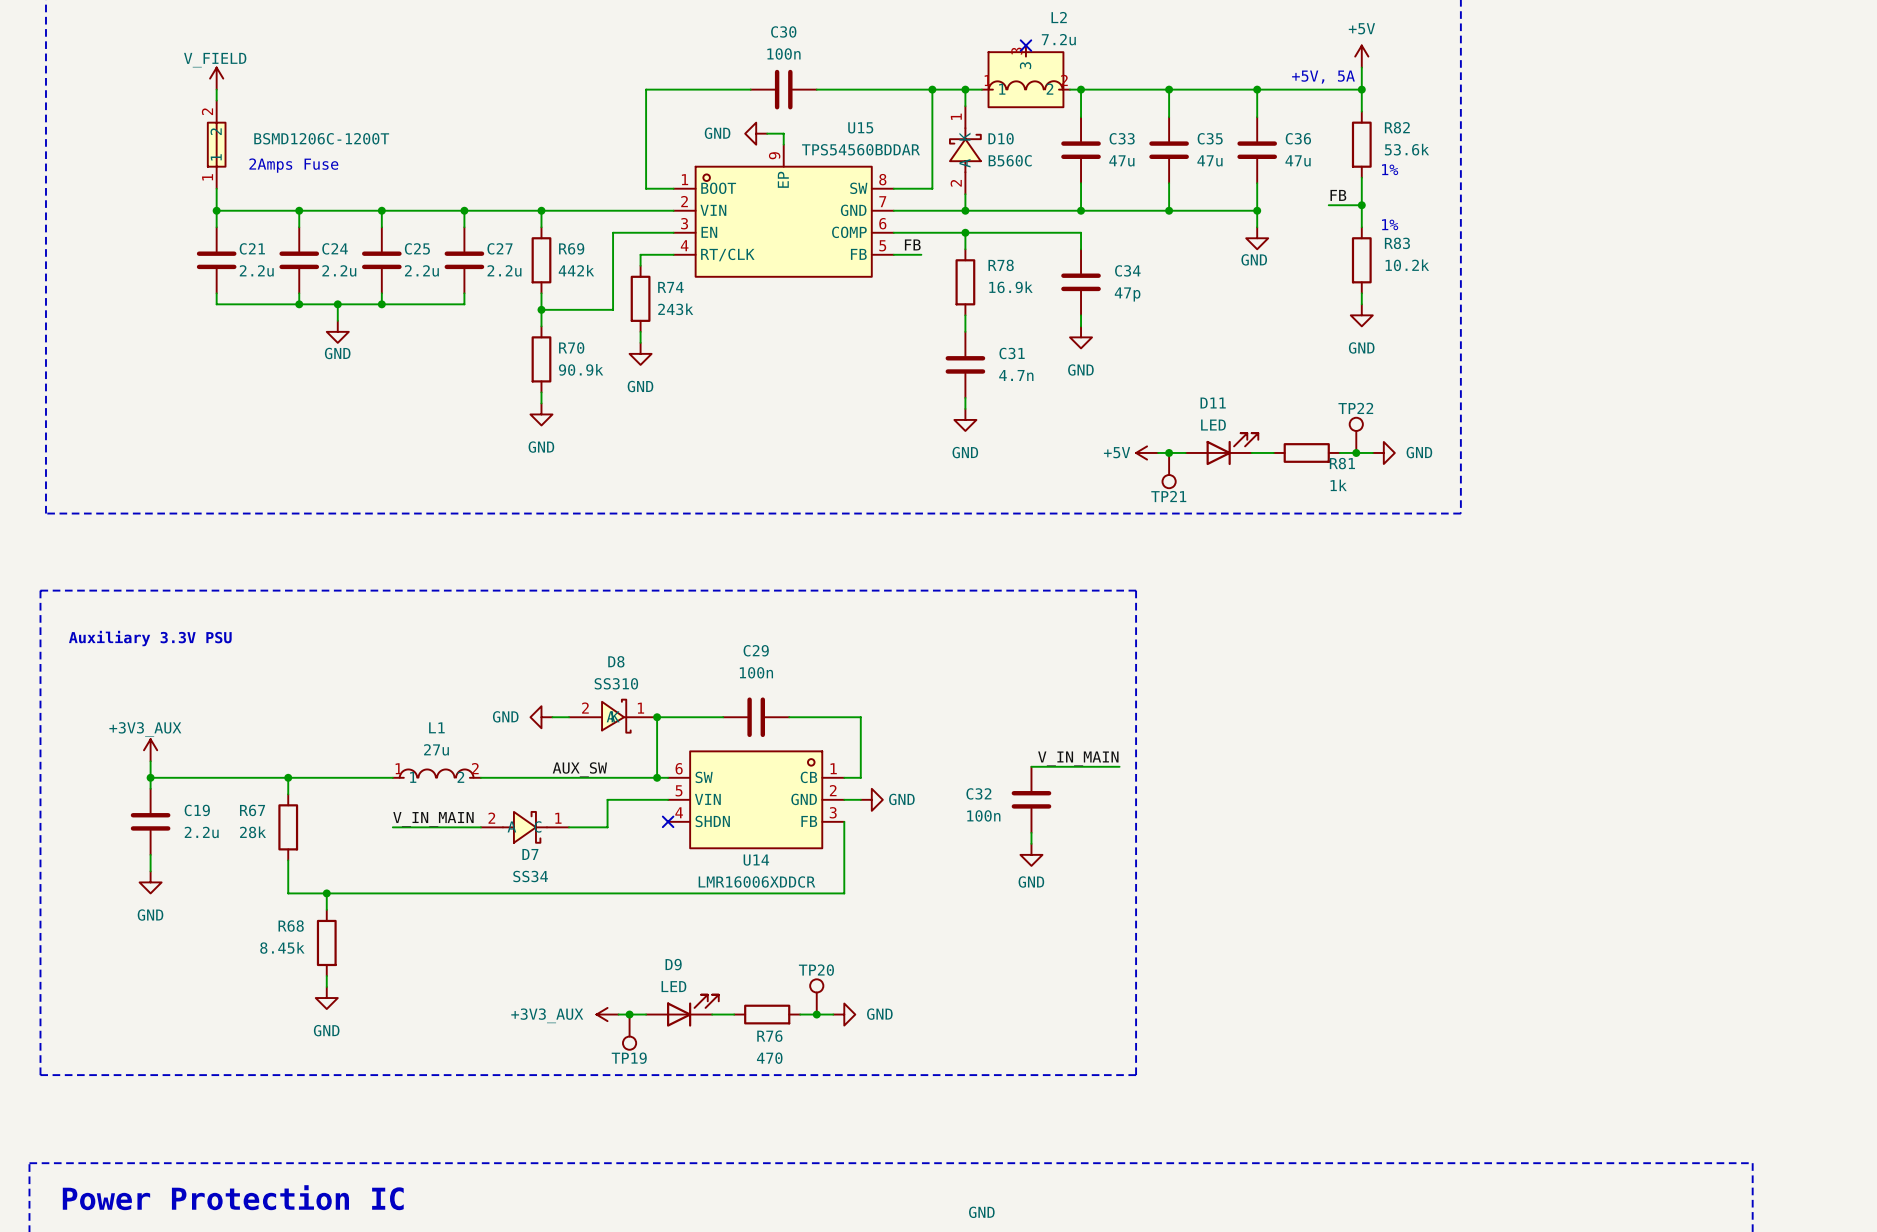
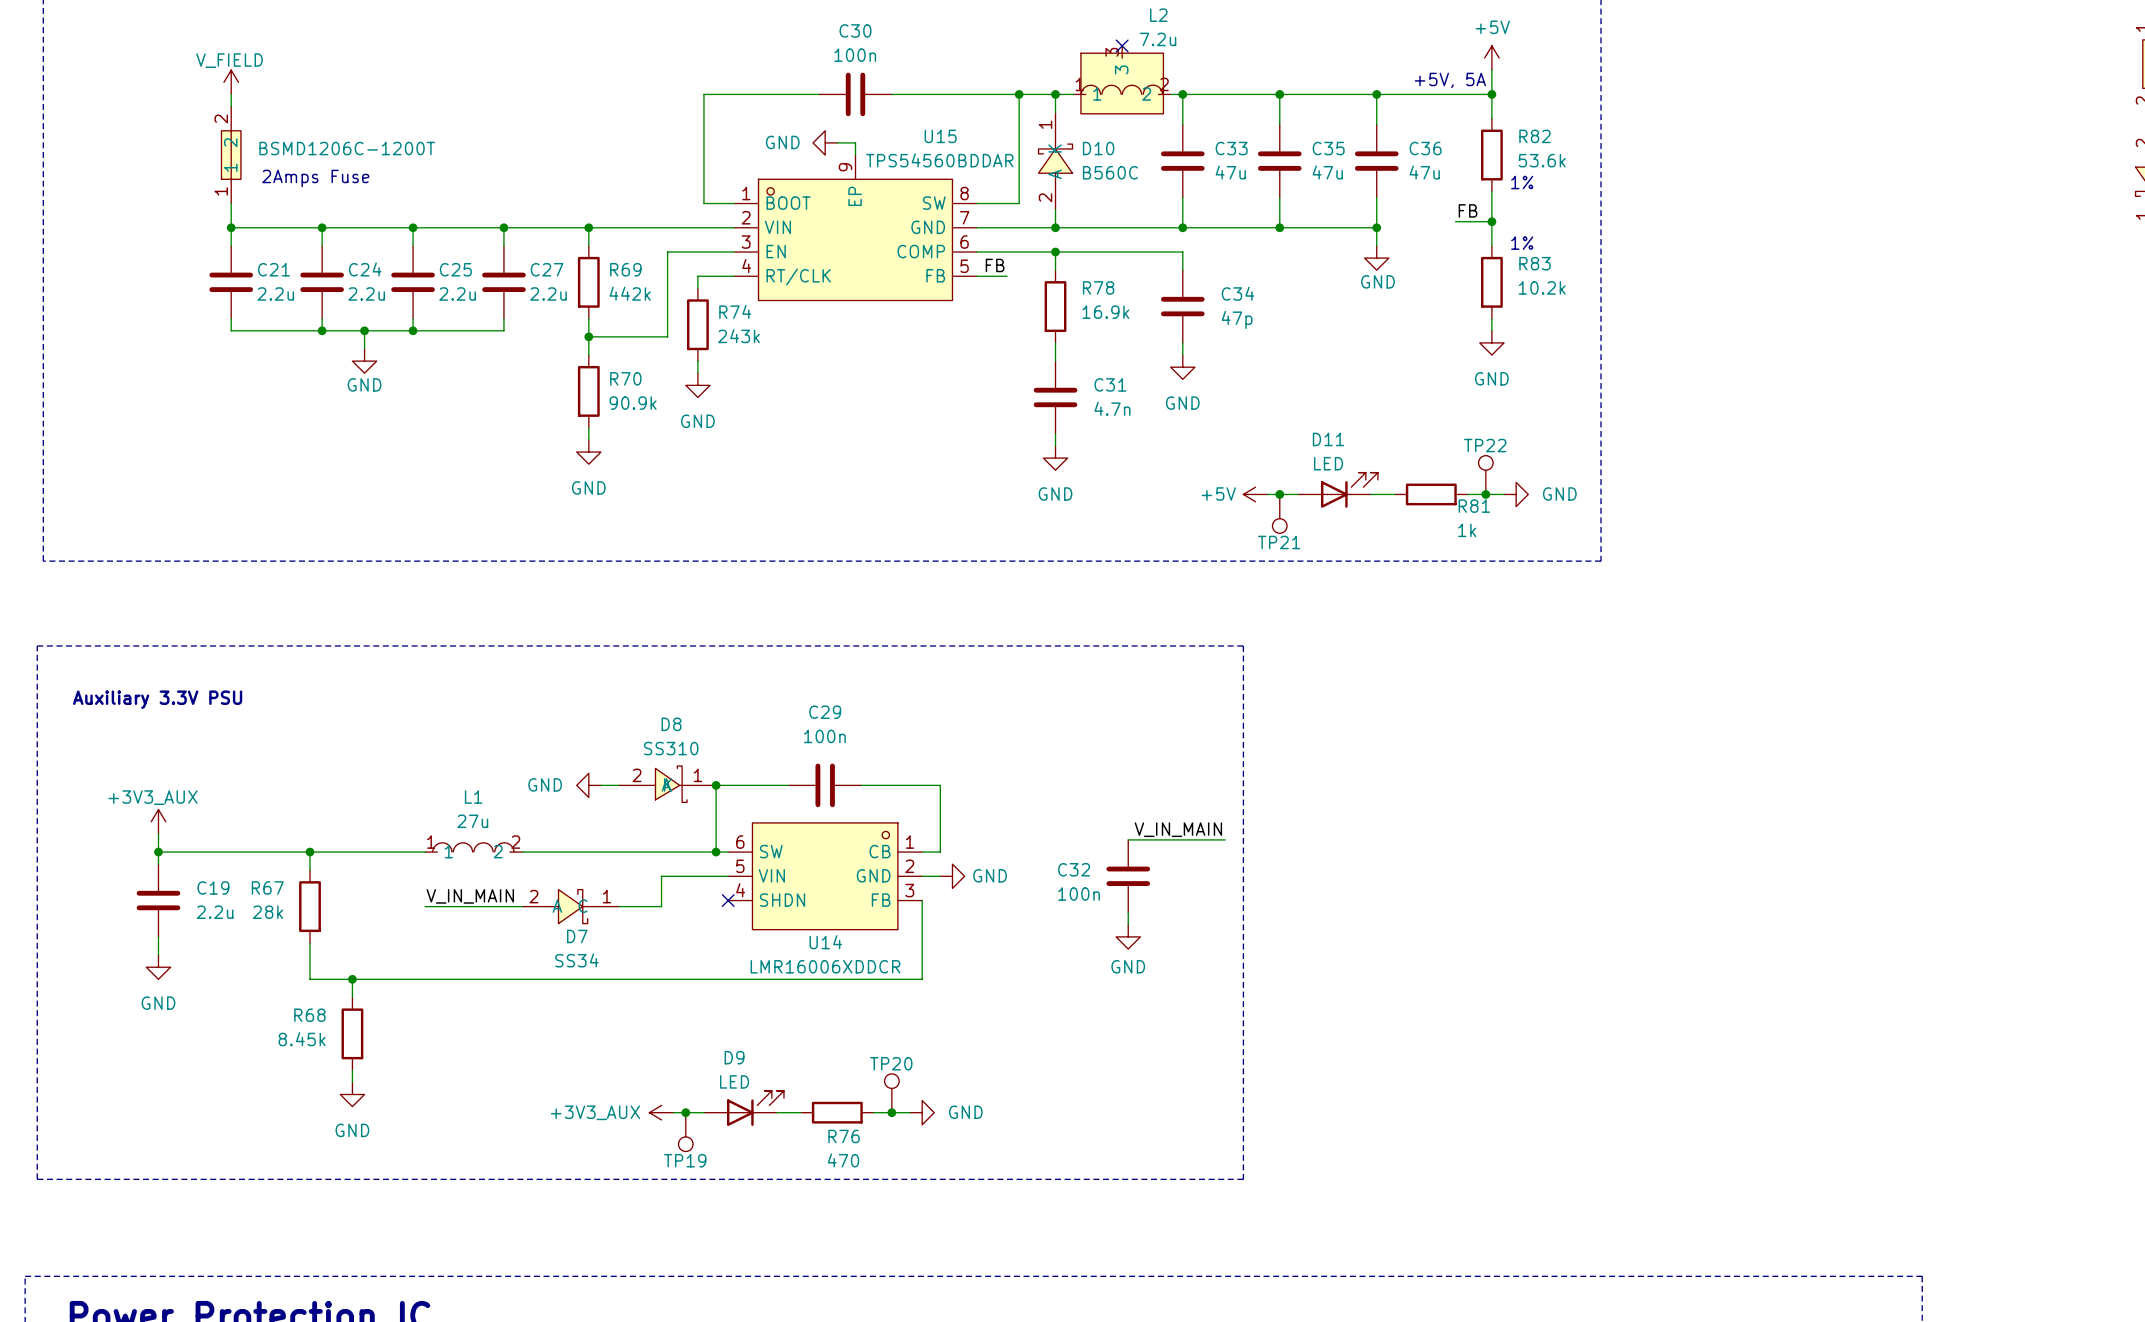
label: AUX_SW (579, 769) -> none

